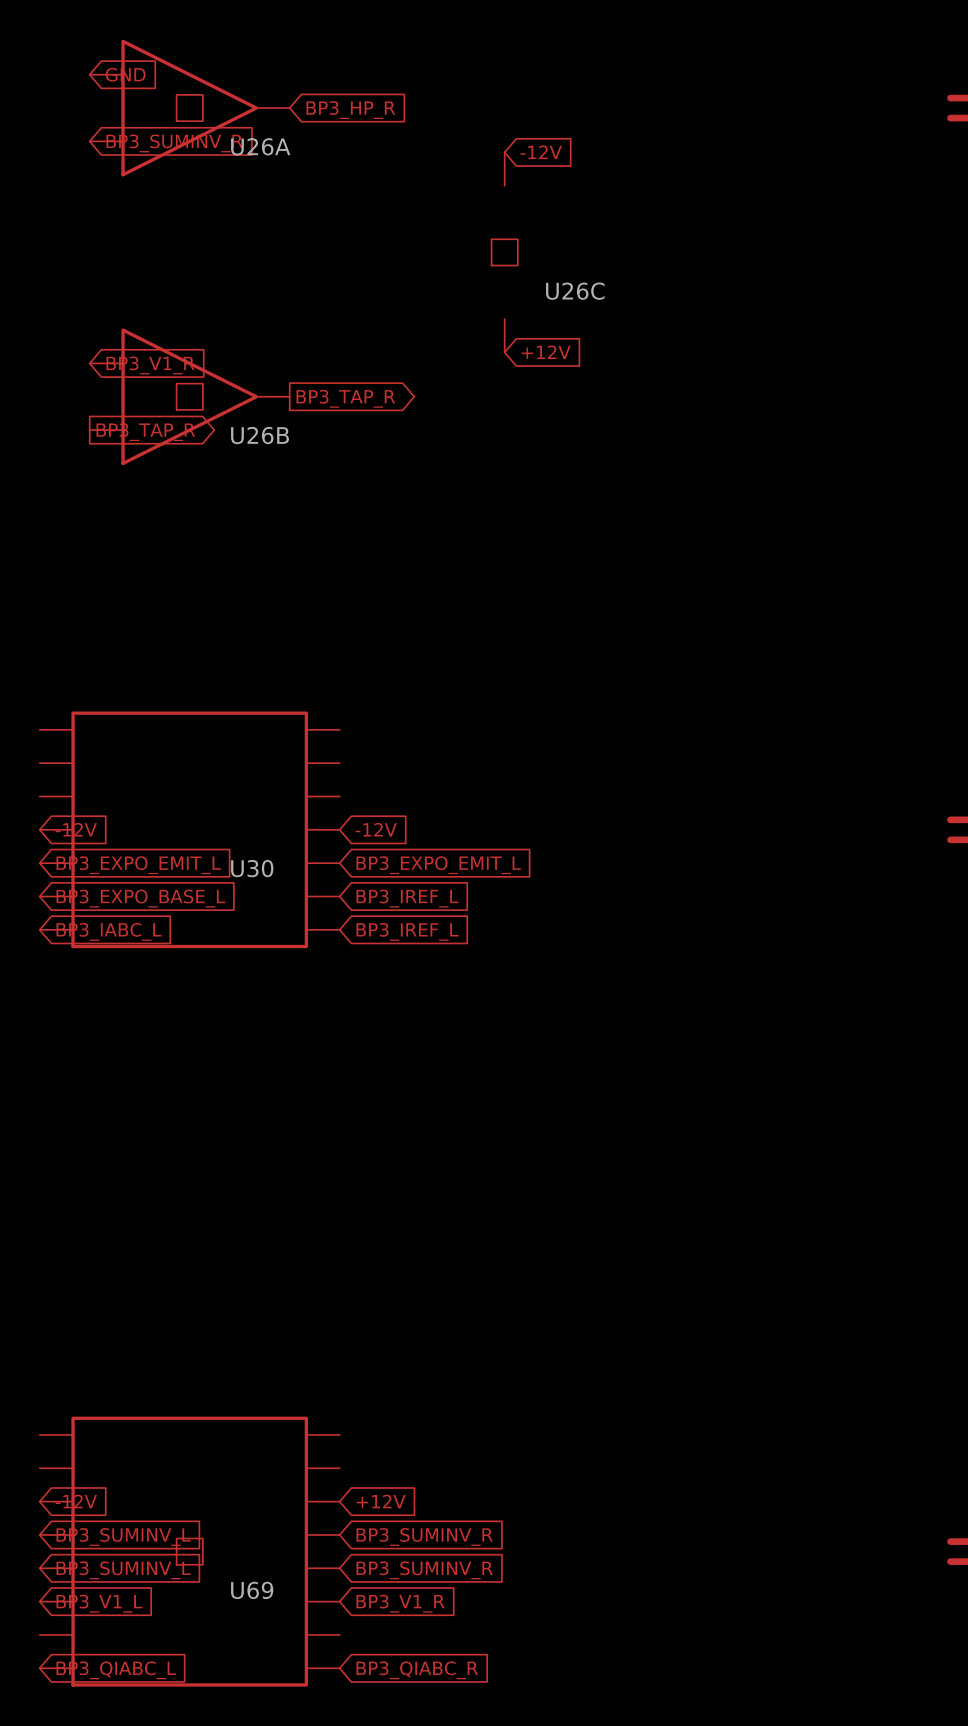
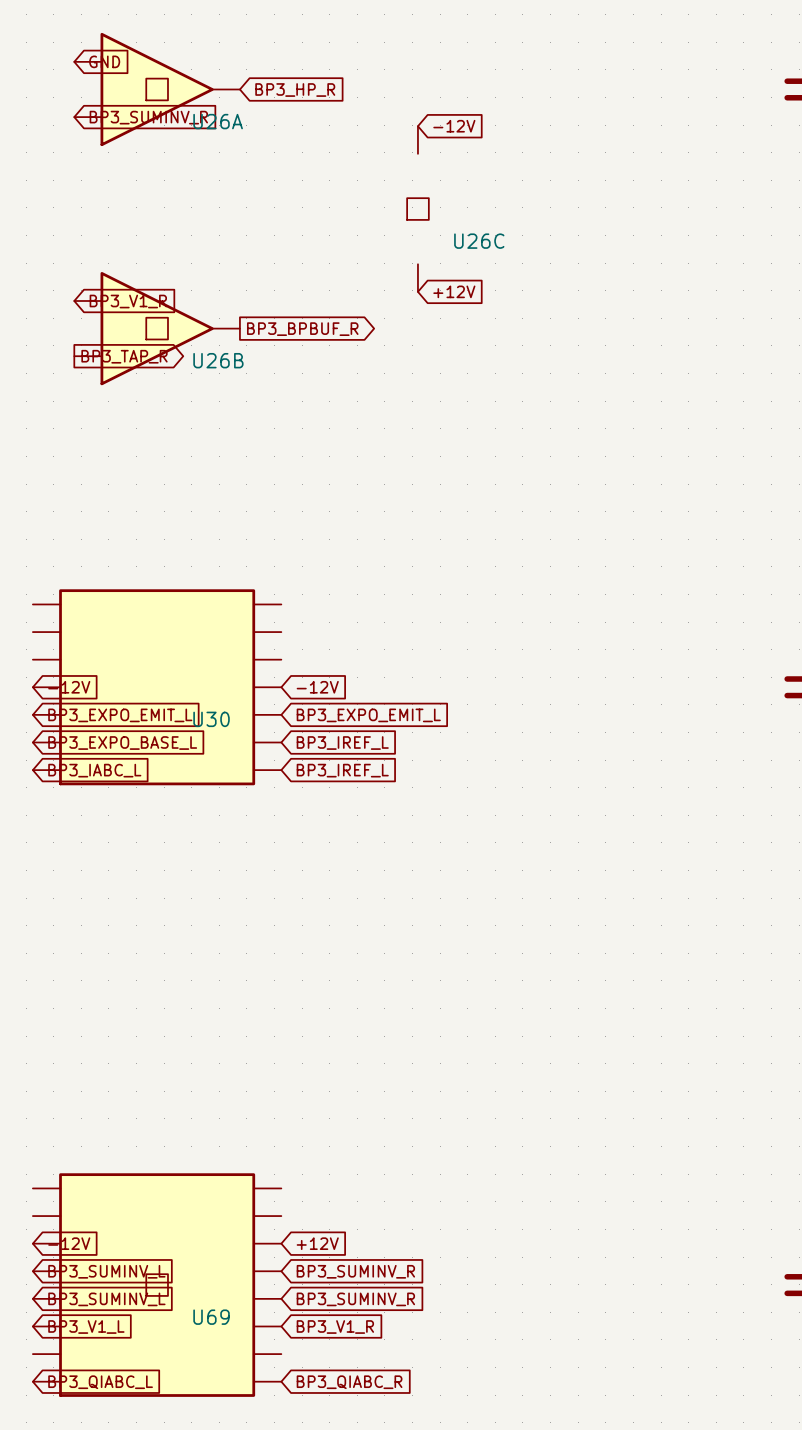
global label: BP3_TAP_R (345, 398) -> BP3_BPBUF_R (302, 329)

